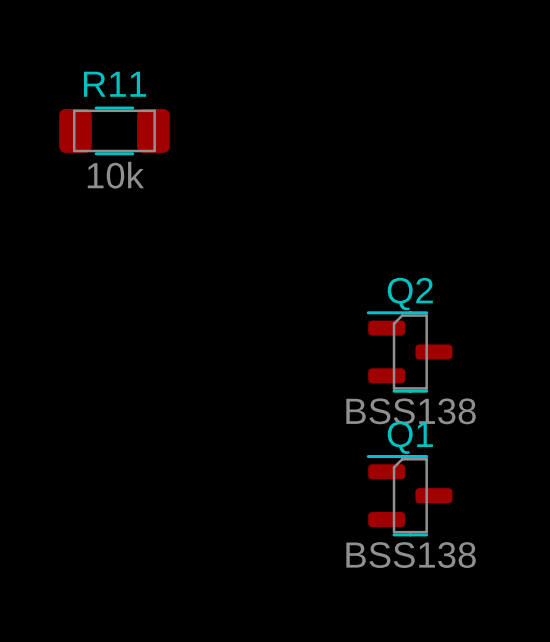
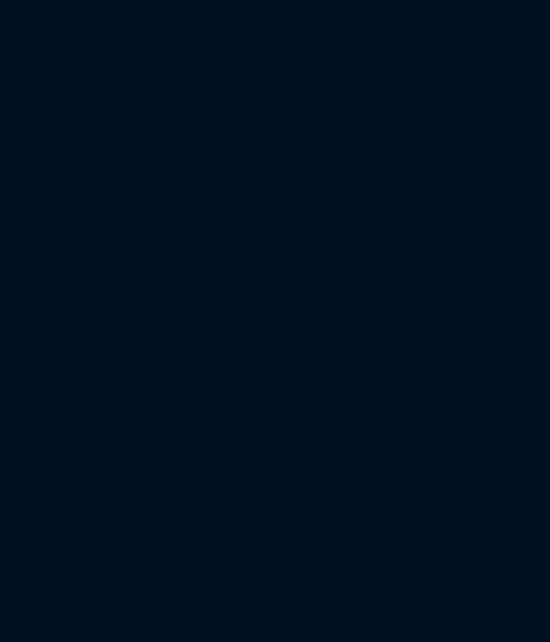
R11: 10k (114, 130) -> none
Q2: BSS138 (409, 351) -> none
Q1: BSS138 (409, 495) -> none

